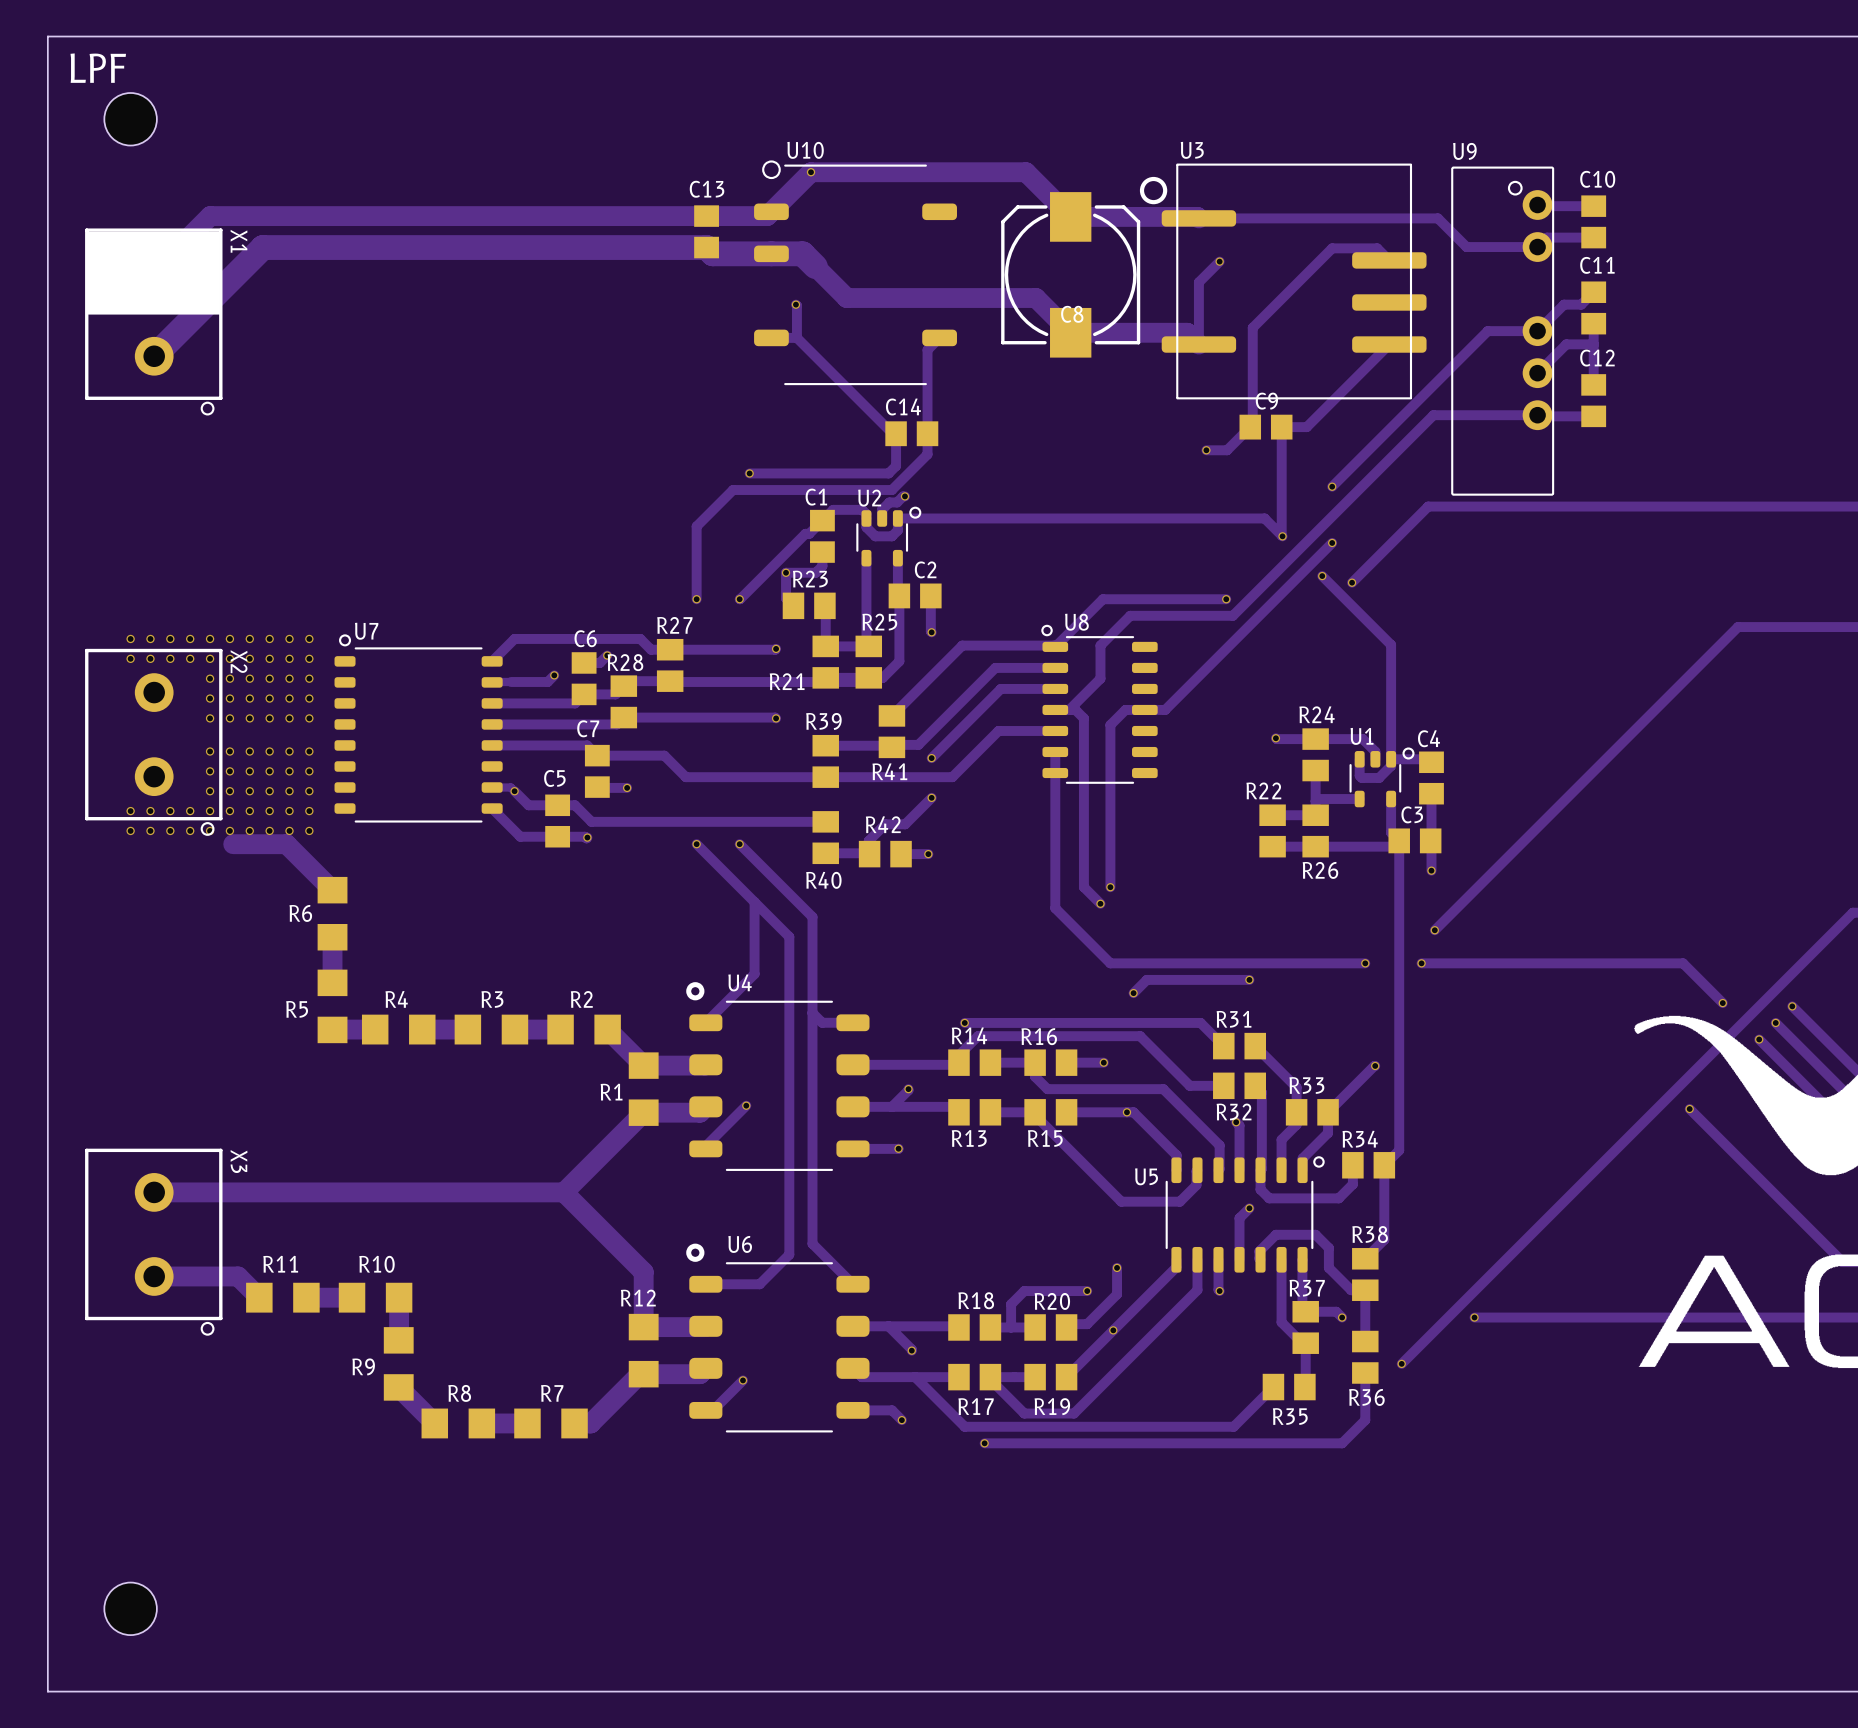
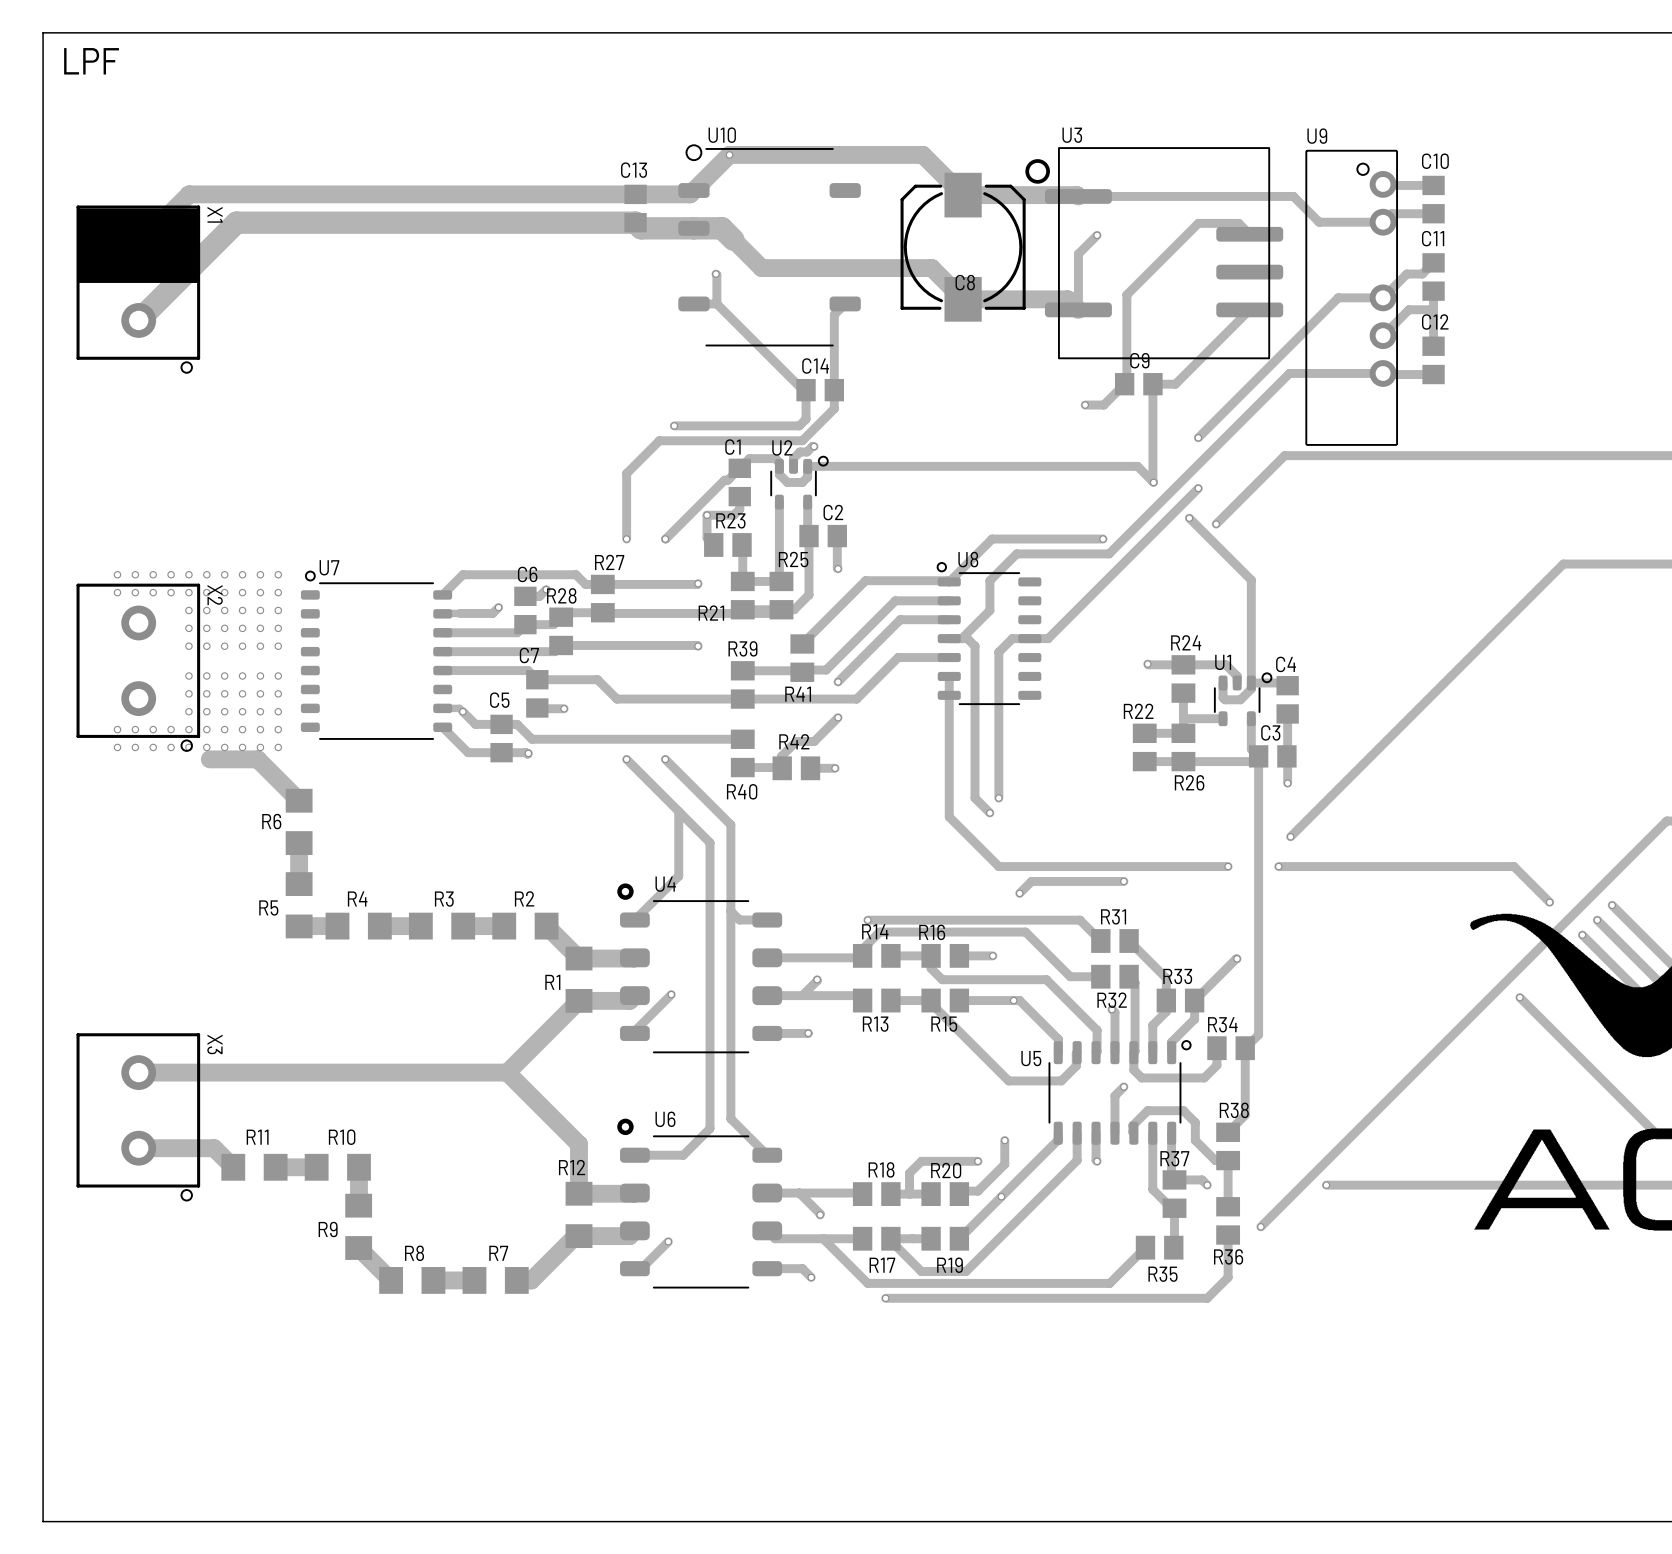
hole: (130, 119) -> none
hole: (130, 1608) -> none

